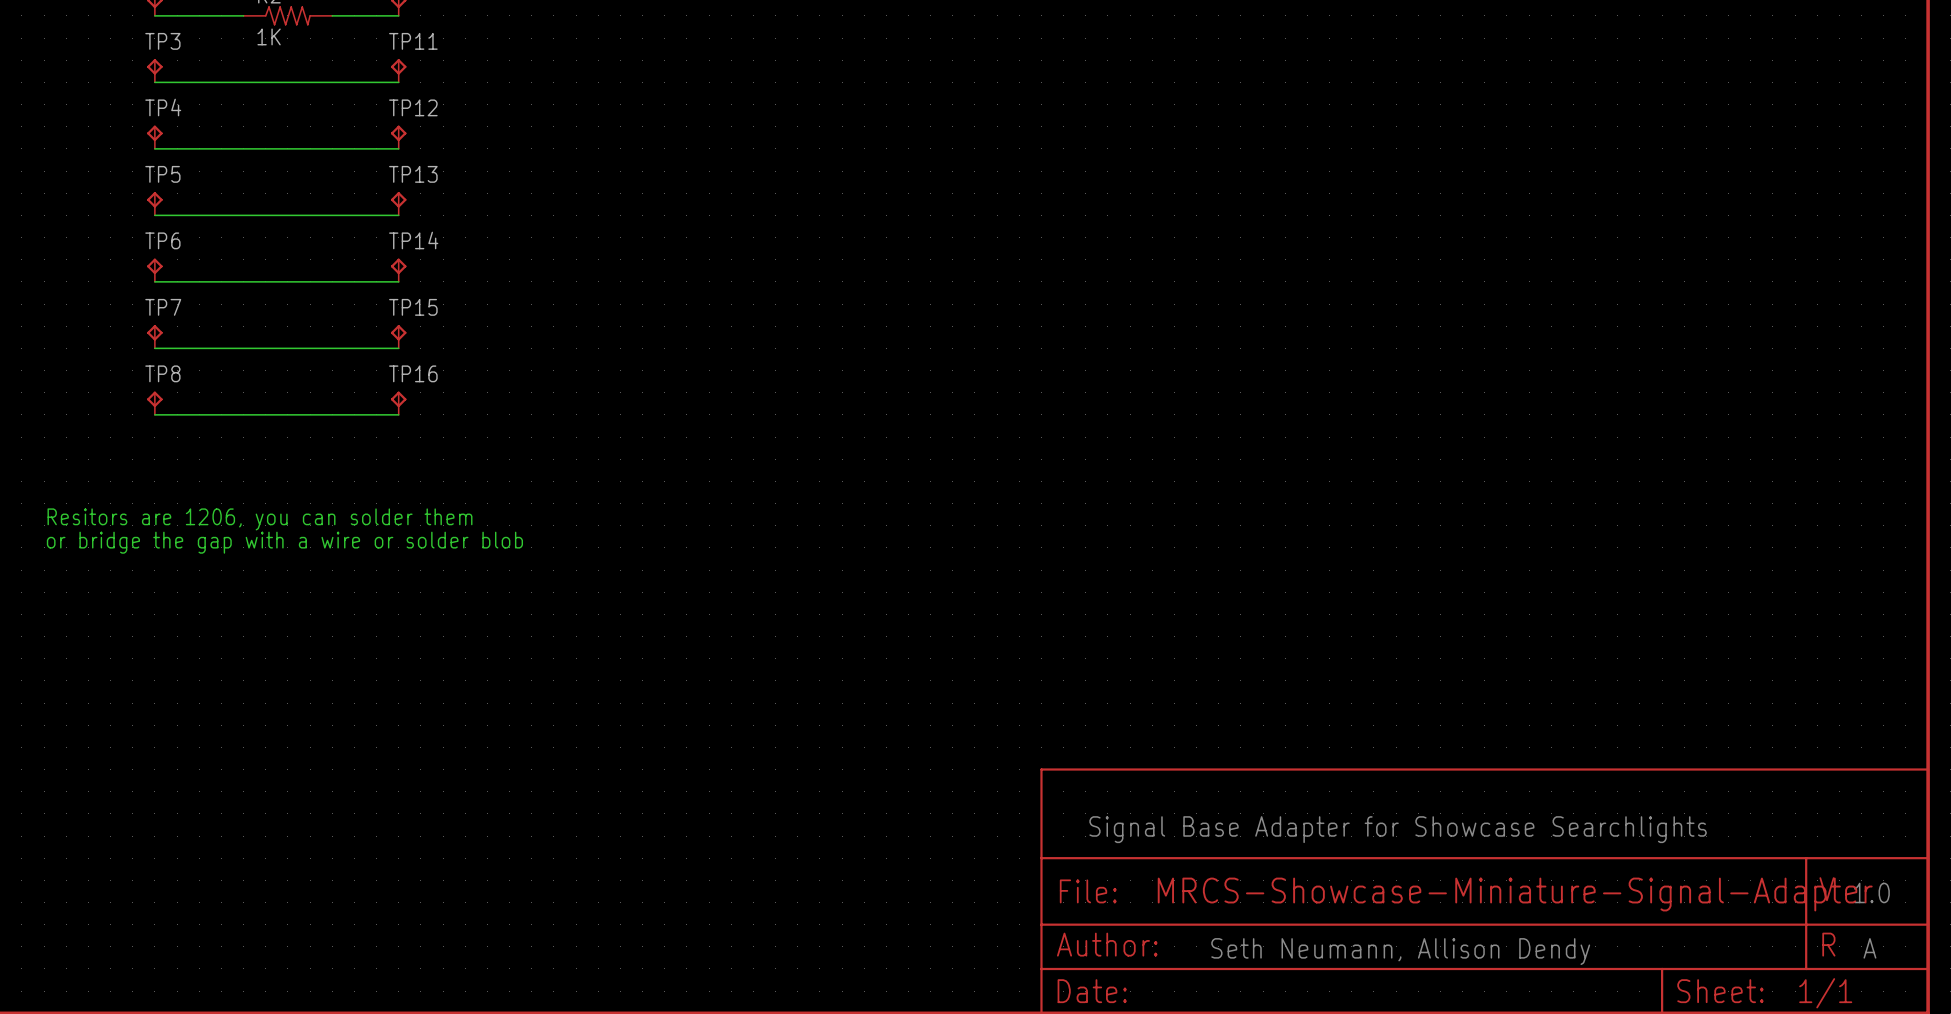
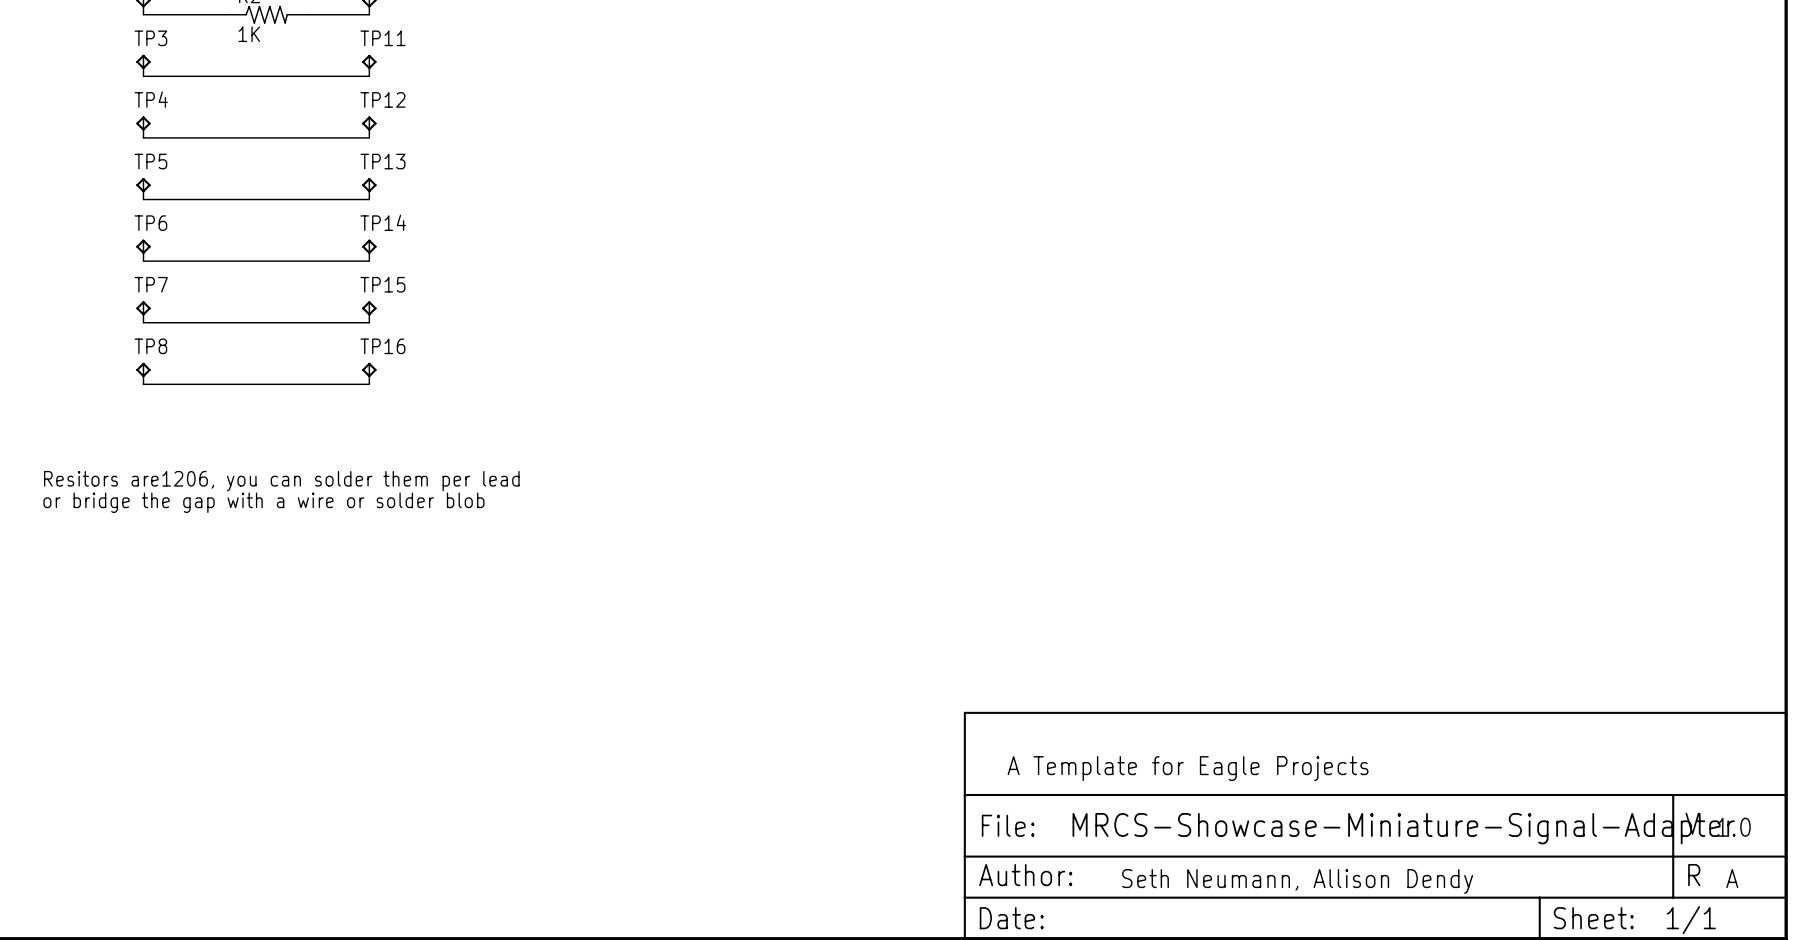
text: Resitors are 1206, you can solder them (259, 519) -> Resitors are1206, you can solder them per lead (281, 481)
text: Signal Base Adapter for Showcase Searchlights (1398, 829) -> A Template for Eagle Projects (1188, 768)

